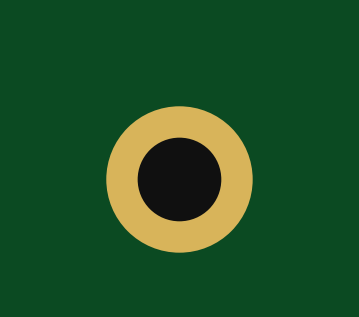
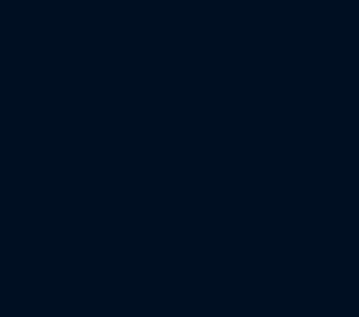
part: (179, 179) -> none

